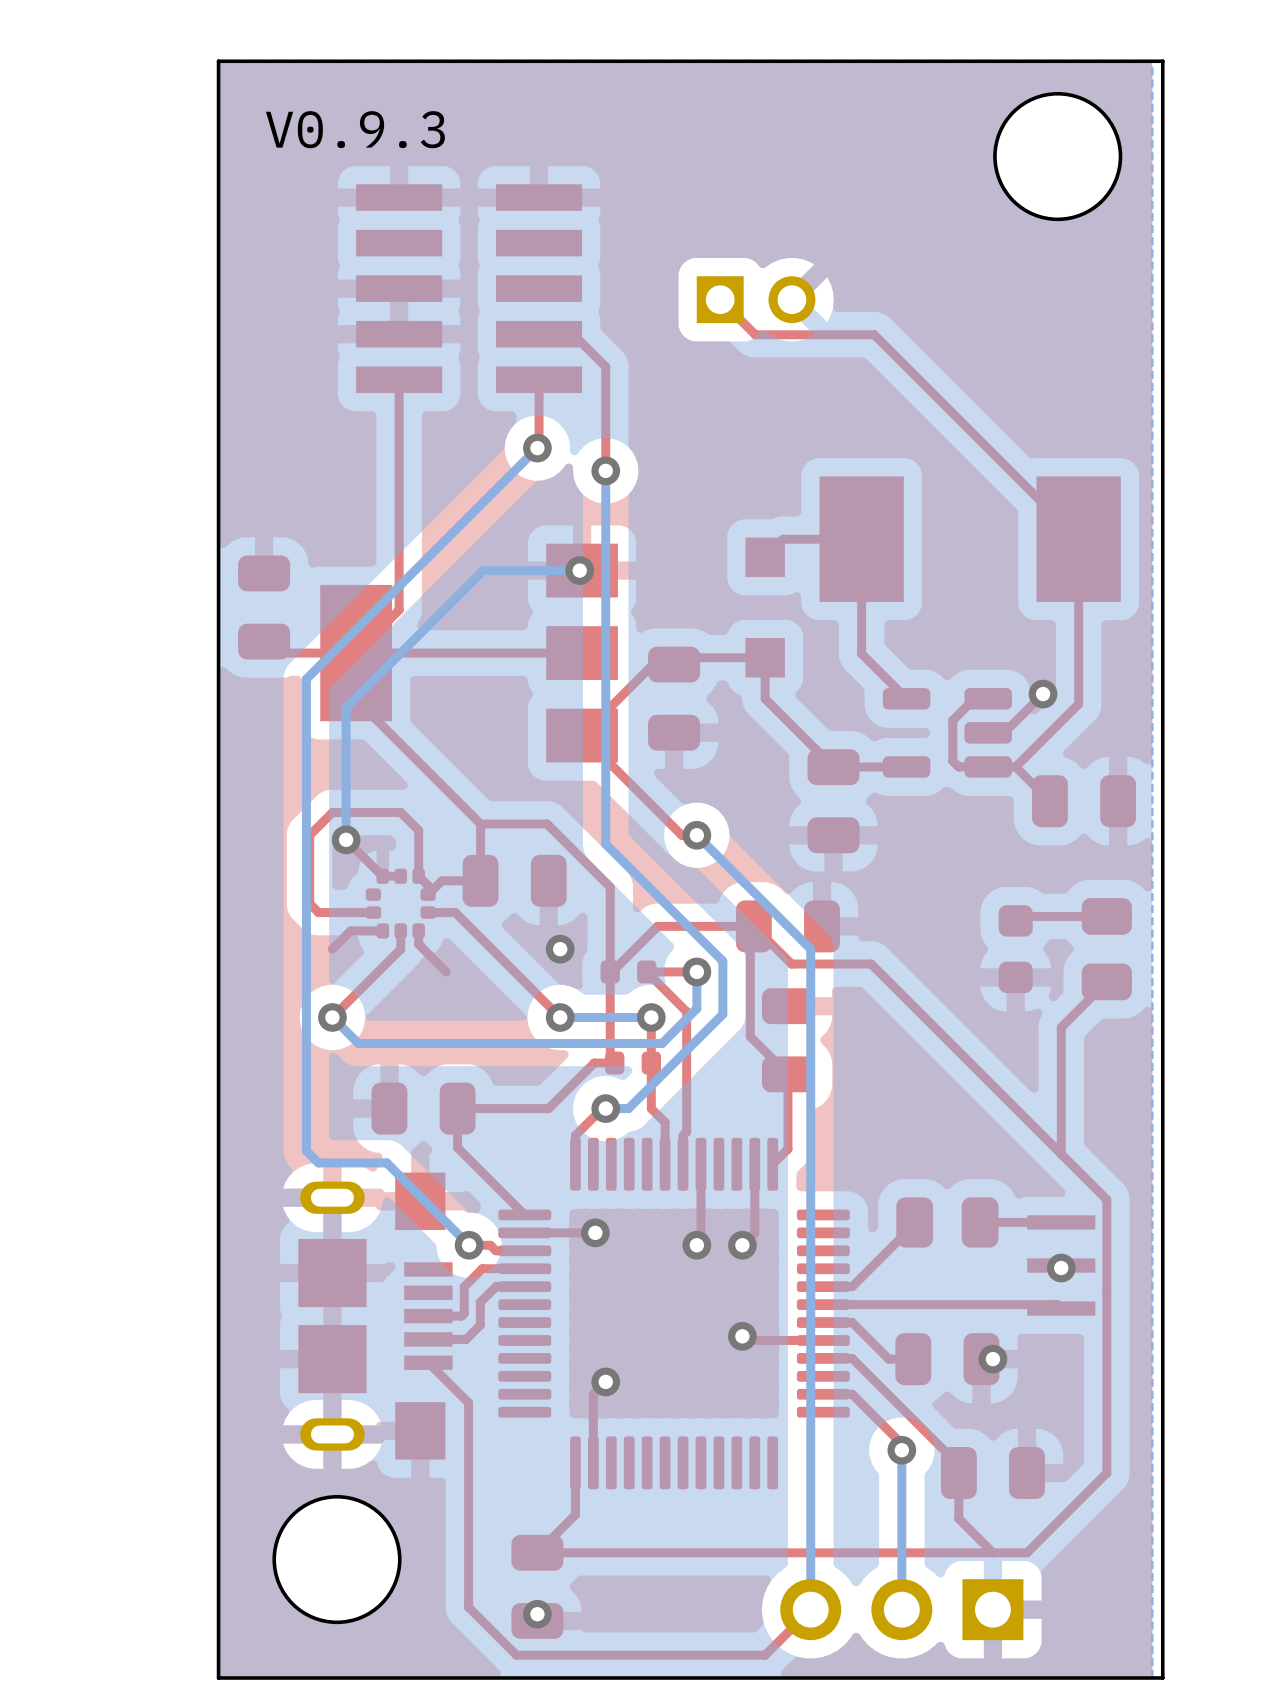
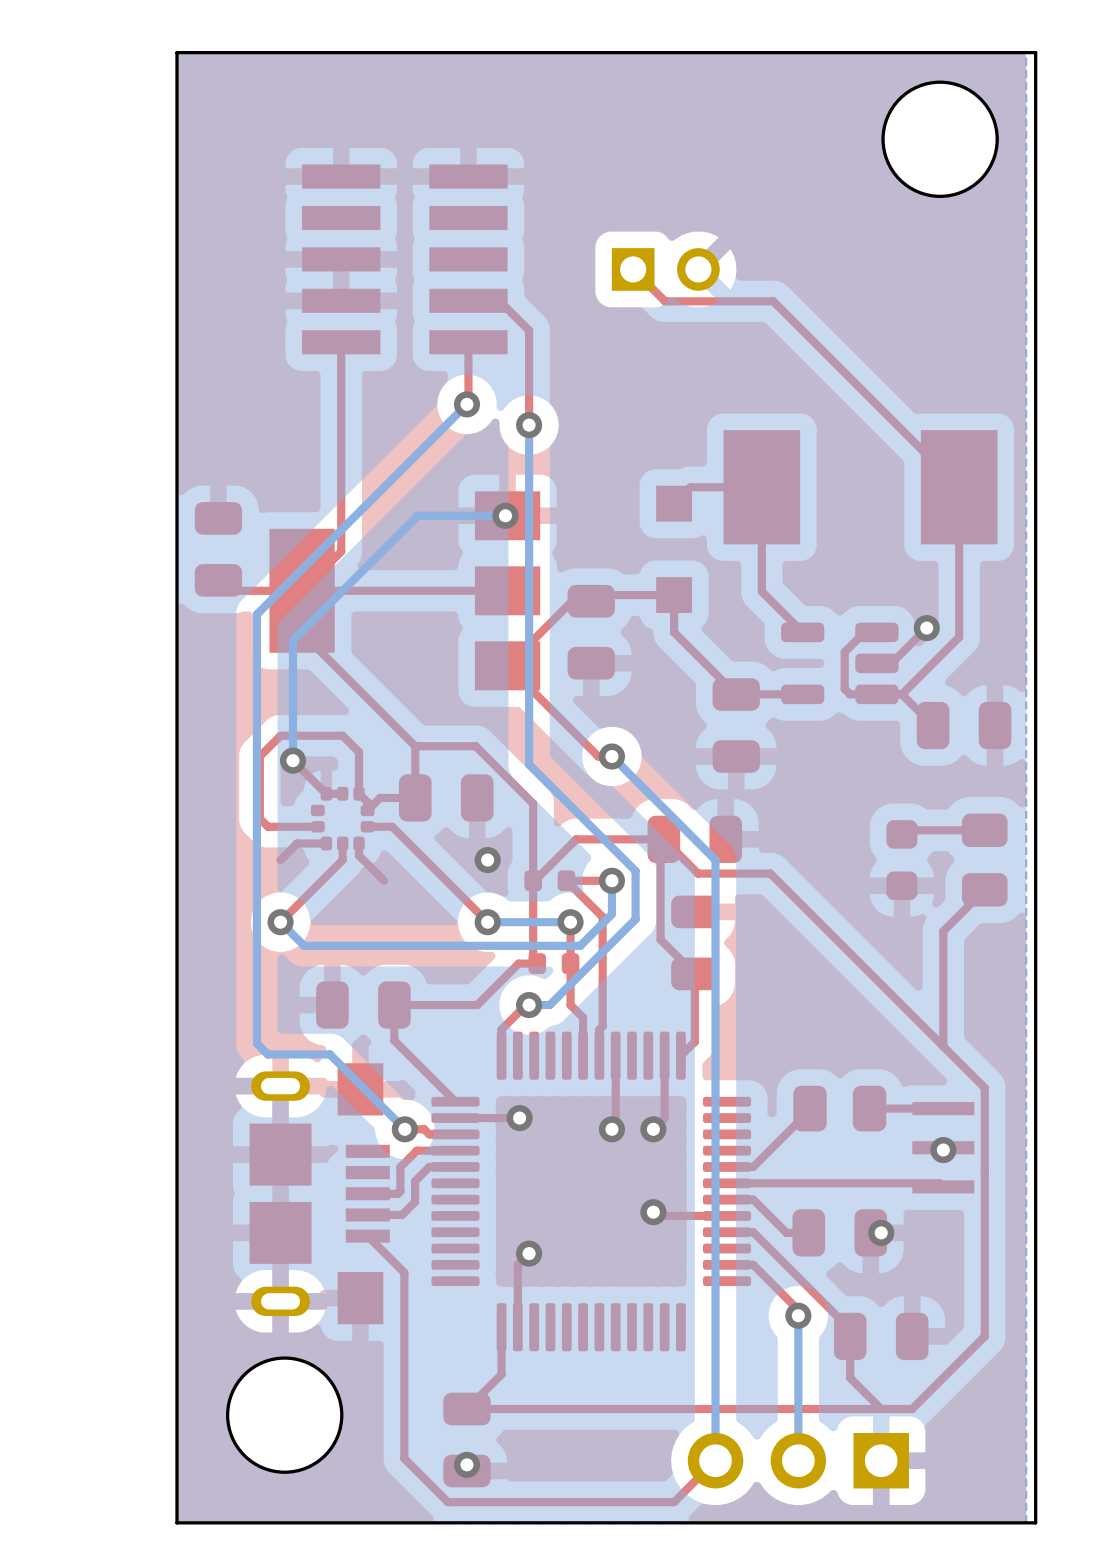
text: V0.9.3 (355, 129) -> none

